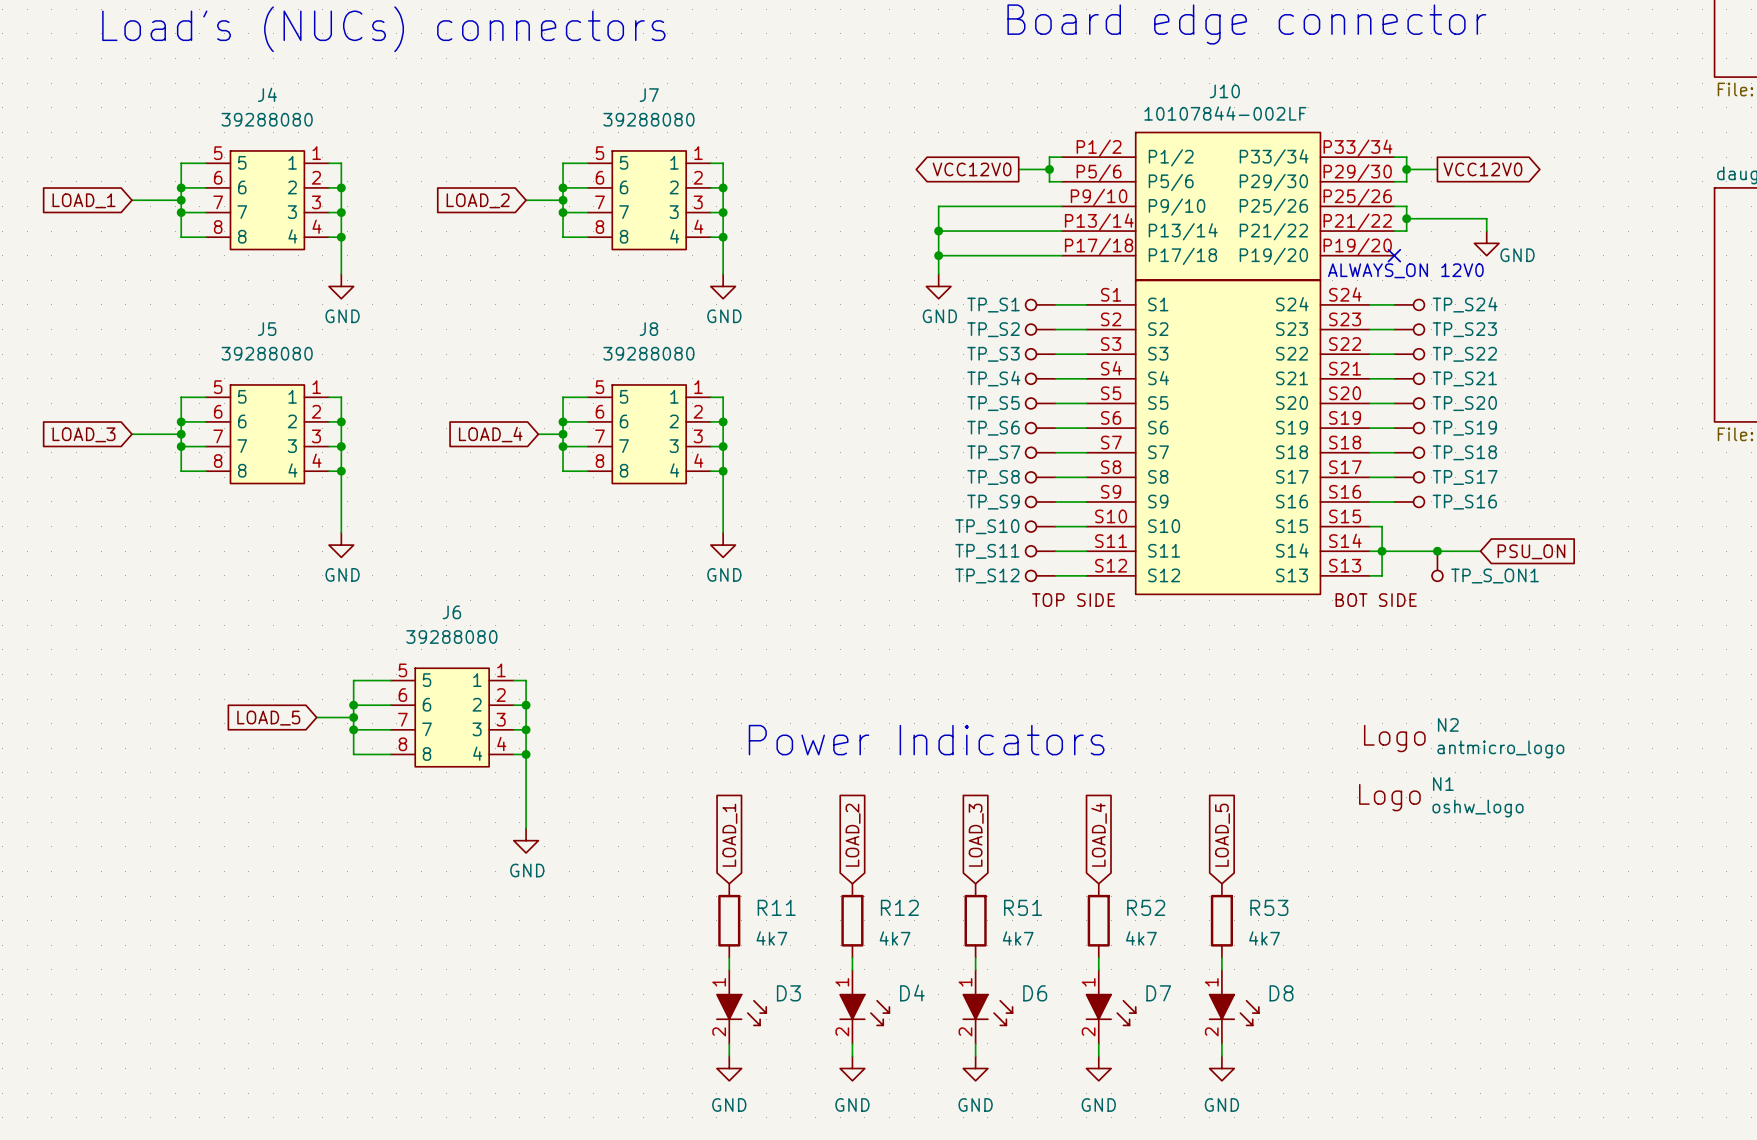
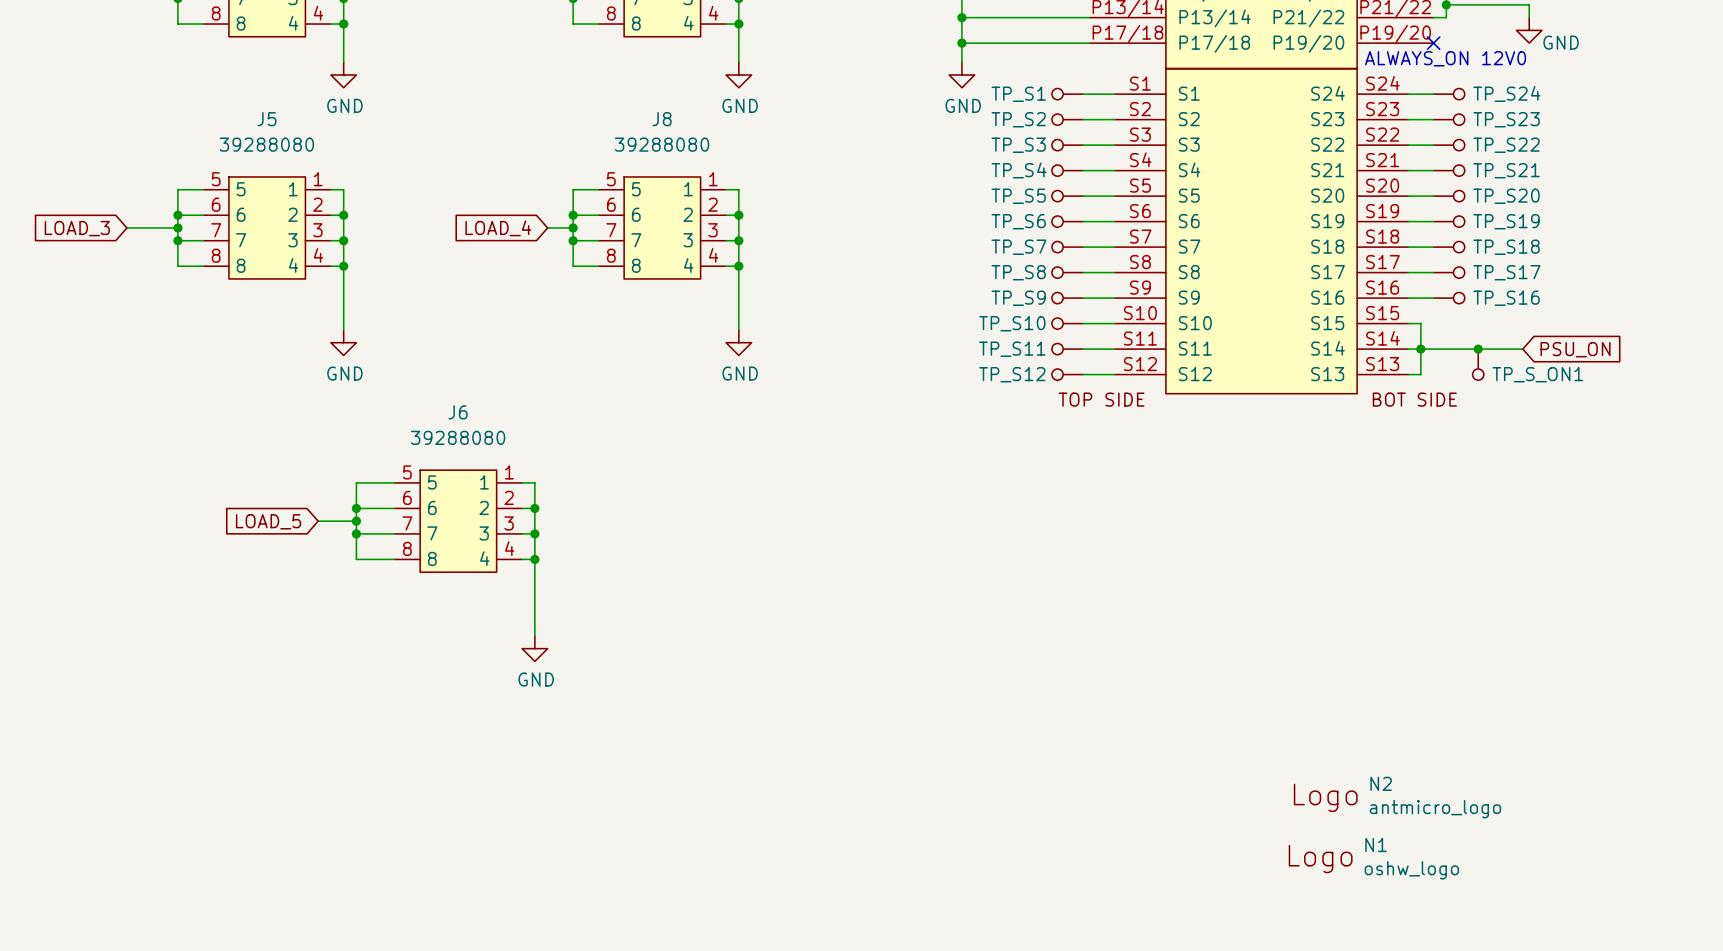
N2 position: (1464, 738) -> (1397, 797)
text: Power Indicators (926, 740) -> none
N1 position: (1441, 797) -> (1373, 858)
global label: LOAD_4 (1099, 834) -> none
global label: LOAD_1 (729, 835) -> none
global label: LOAD_2 (853, 835) -> none
global label: LOAD_3 (976, 835) -> none
global label: LOAD_5 (1222, 835) -> none
R11: (729, 920) -> none
R12: (852, 920) -> none
R51: (975, 920) -> none
R52: (1098, 920) -> none
R53: (1221, 920) -> none
wire: (729, 957) (729, 969) -> none
wire: (852, 957) (852, 969) -> none
wire: (975, 957) (975, 969) -> none
wire: (1098, 957) (1098, 969) -> none
wire: (1221, 957) (1221, 969) -> none
D3: (741, 1006) -> none
D4: (864, 1006) -> none
D6: (987, 1006) -> none
D7: (1111, 1006) -> none
D8: (1234, 1006) -> none
wire: (729, 1043) (729, 1056) -> none
wire: (852, 1043) (852, 1056) -> none
wire: (975, 1043) (975, 1056) -> none
wire: (1098, 1043) (1098, 1056) -> none
wire: (1221, 1043) (1221, 1056) -> none
power symbol: GND (729, 1068) -> none
power symbol: GND (852, 1068) -> none
power symbol: GND (975, 1068) -> none
power symbol: GND (1098, 1068) -> none
power symbol: GND (1221, 1068) -> none

